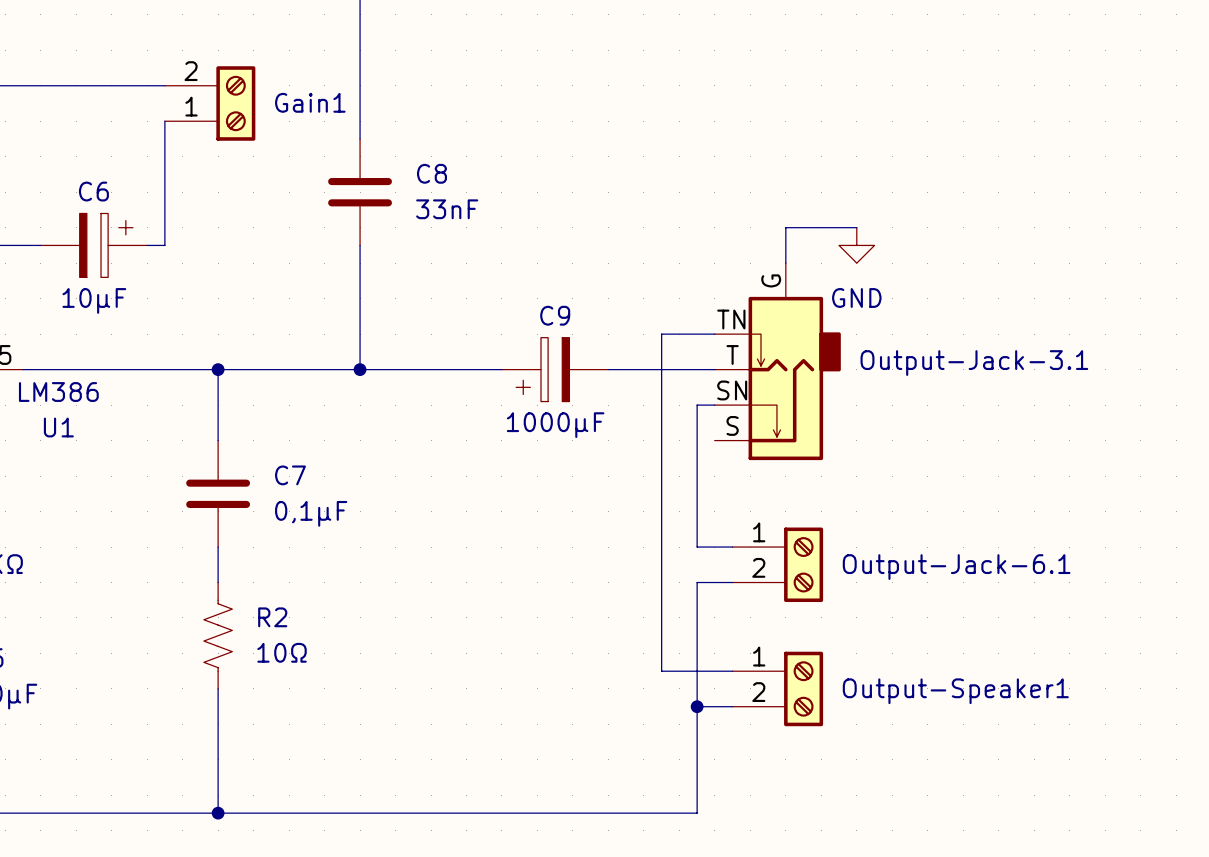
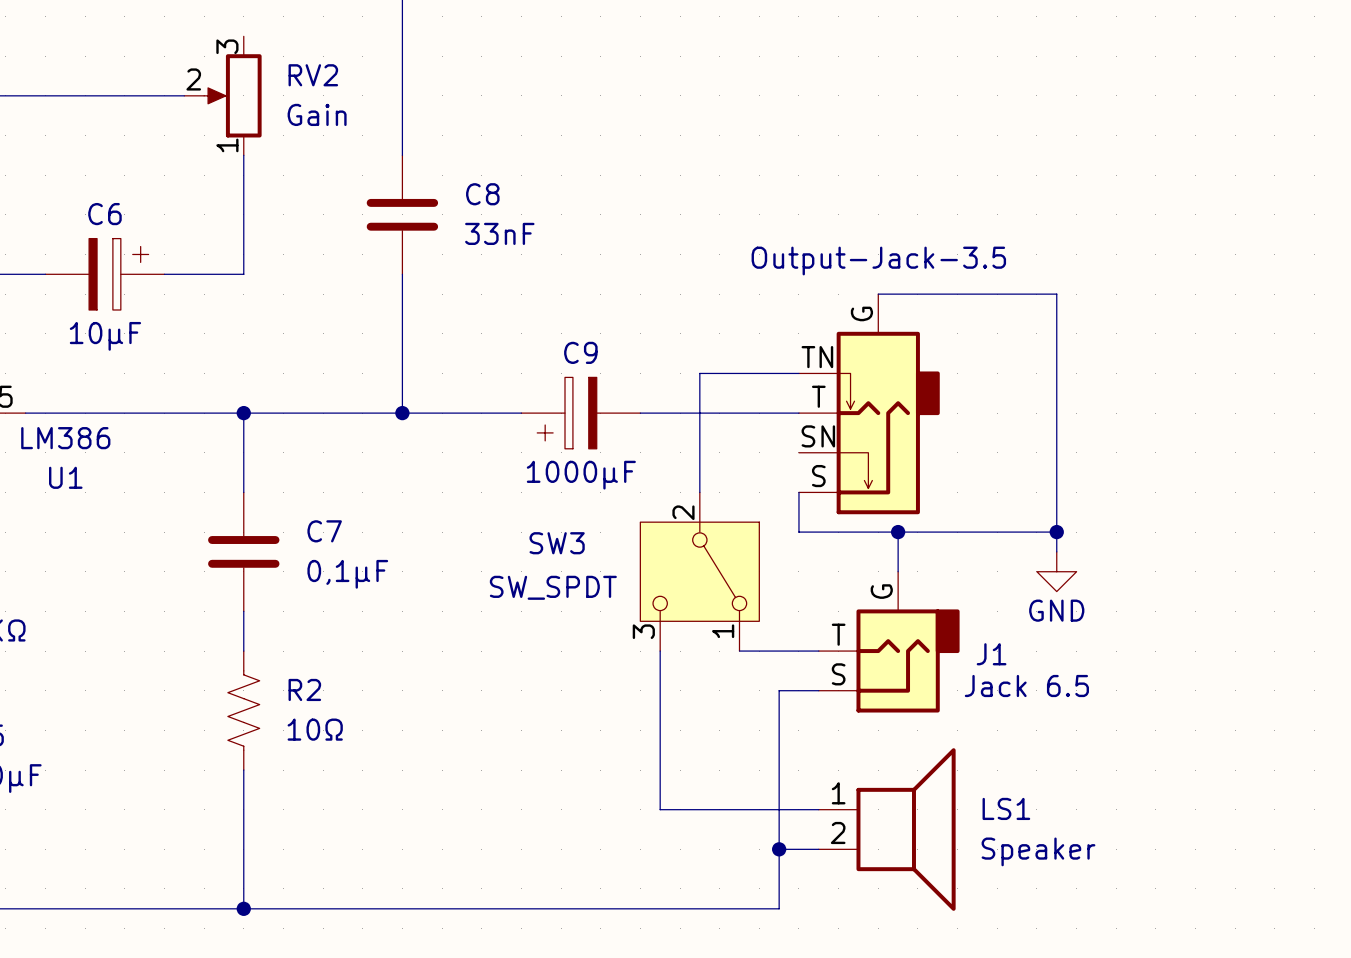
RV2: none -> Gain (222, 95)
Gain1: (210, 103) -> none
wire: (164, 121) (164, 245) -> (243, 155) (243, 274) (184, 274)
wire: (856, 227) (785, 227) (785, 263) -> (1056, 551) (1056, 294) (878, 294)
power symbol position: GND (856, 245) -> GND (1056, 571)
power symbol text position: GND (856, 297) -> GND (1056, 610)
wire: (661, 334) (661, 671) (732, 671) -> (739, 373) (699, 373) (699, 492)
Output-Jack-3.1 name: Output-Jack-3.1 (974, 363) -> Output-Jack-3.5 (878, 261)
C9 position: (555, 369) -> (580, 413)
wire: (714, 405) (697, 405) (697, 547) (732, 547) -> none
wire: none -> (798, 492) (798, 532) (1056, 532)
wire: none -> (898, 532) (898, 571)
junction: none -> (898, 532)
junction: none -> (1056, 532)
SW3: none -> SW_SPDT (699, 571)
Output-Jack-6.1: (777, 564) -> none
J1: none -> Jack 6.5 (889, 642)
wire: none -> (660, 651) (660, 809) (818, 809)
wire: (697, 582) (697, 617) -> (779, 651) (739, 651)
wire: none -> (779, 690) (818, 690)
Output-Speaker1: (777, 688) -> none
wire: (697, 706) (732, 706) -> (779, 849) (818, 849)
junction position: (697, 706) -> (779, 849)
LS1: none -> Speaker (887, 829)

